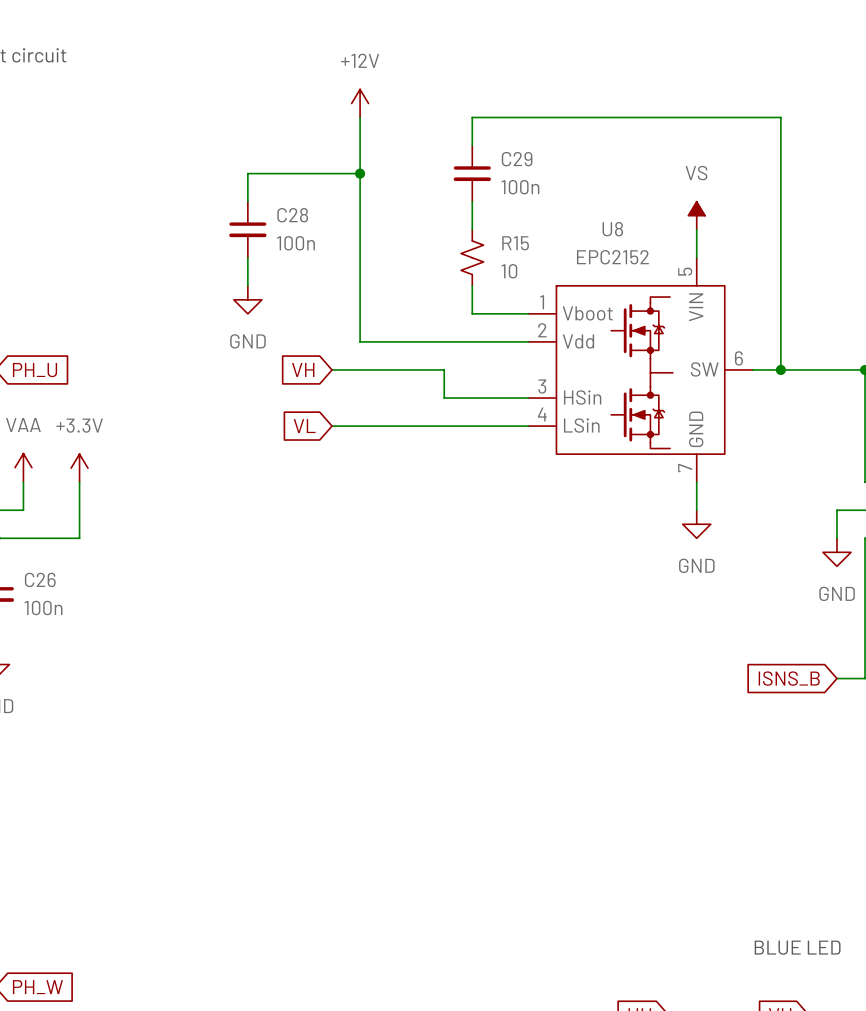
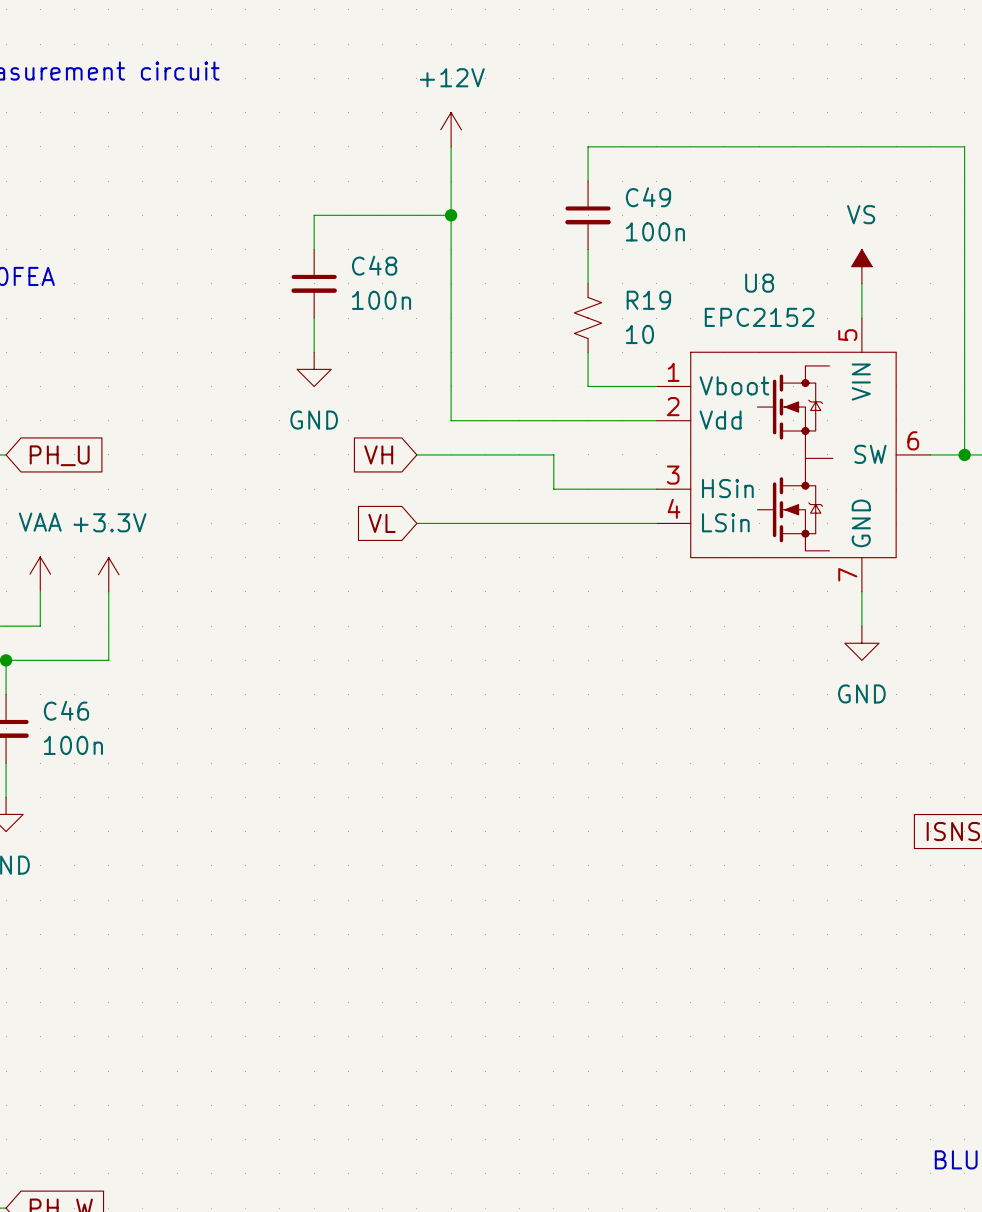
C29 name: C29 (517, 159) -> C49 (648, 197)
C28 name: C28 (292, 215) -> C48 (374, 265)
R15 name: R15 (515, 243) -> R19 (648, 300)
C26 name: C26 (40, 579) -> C46 (66, 710)

